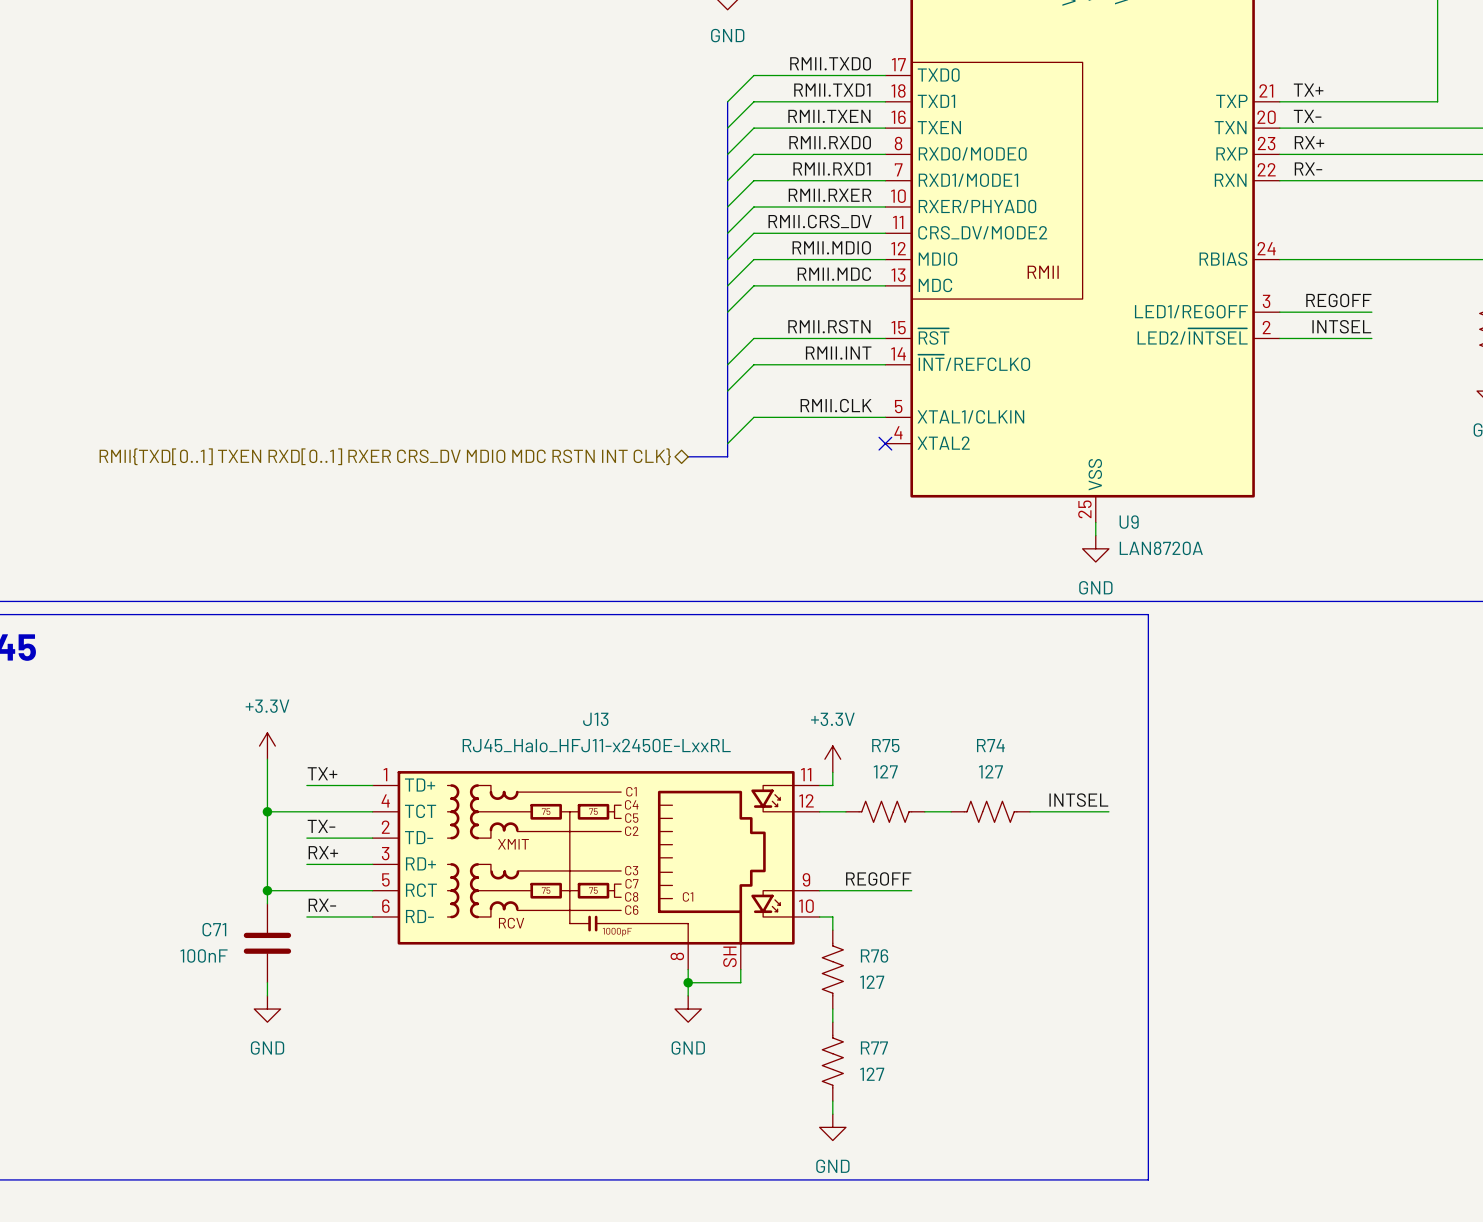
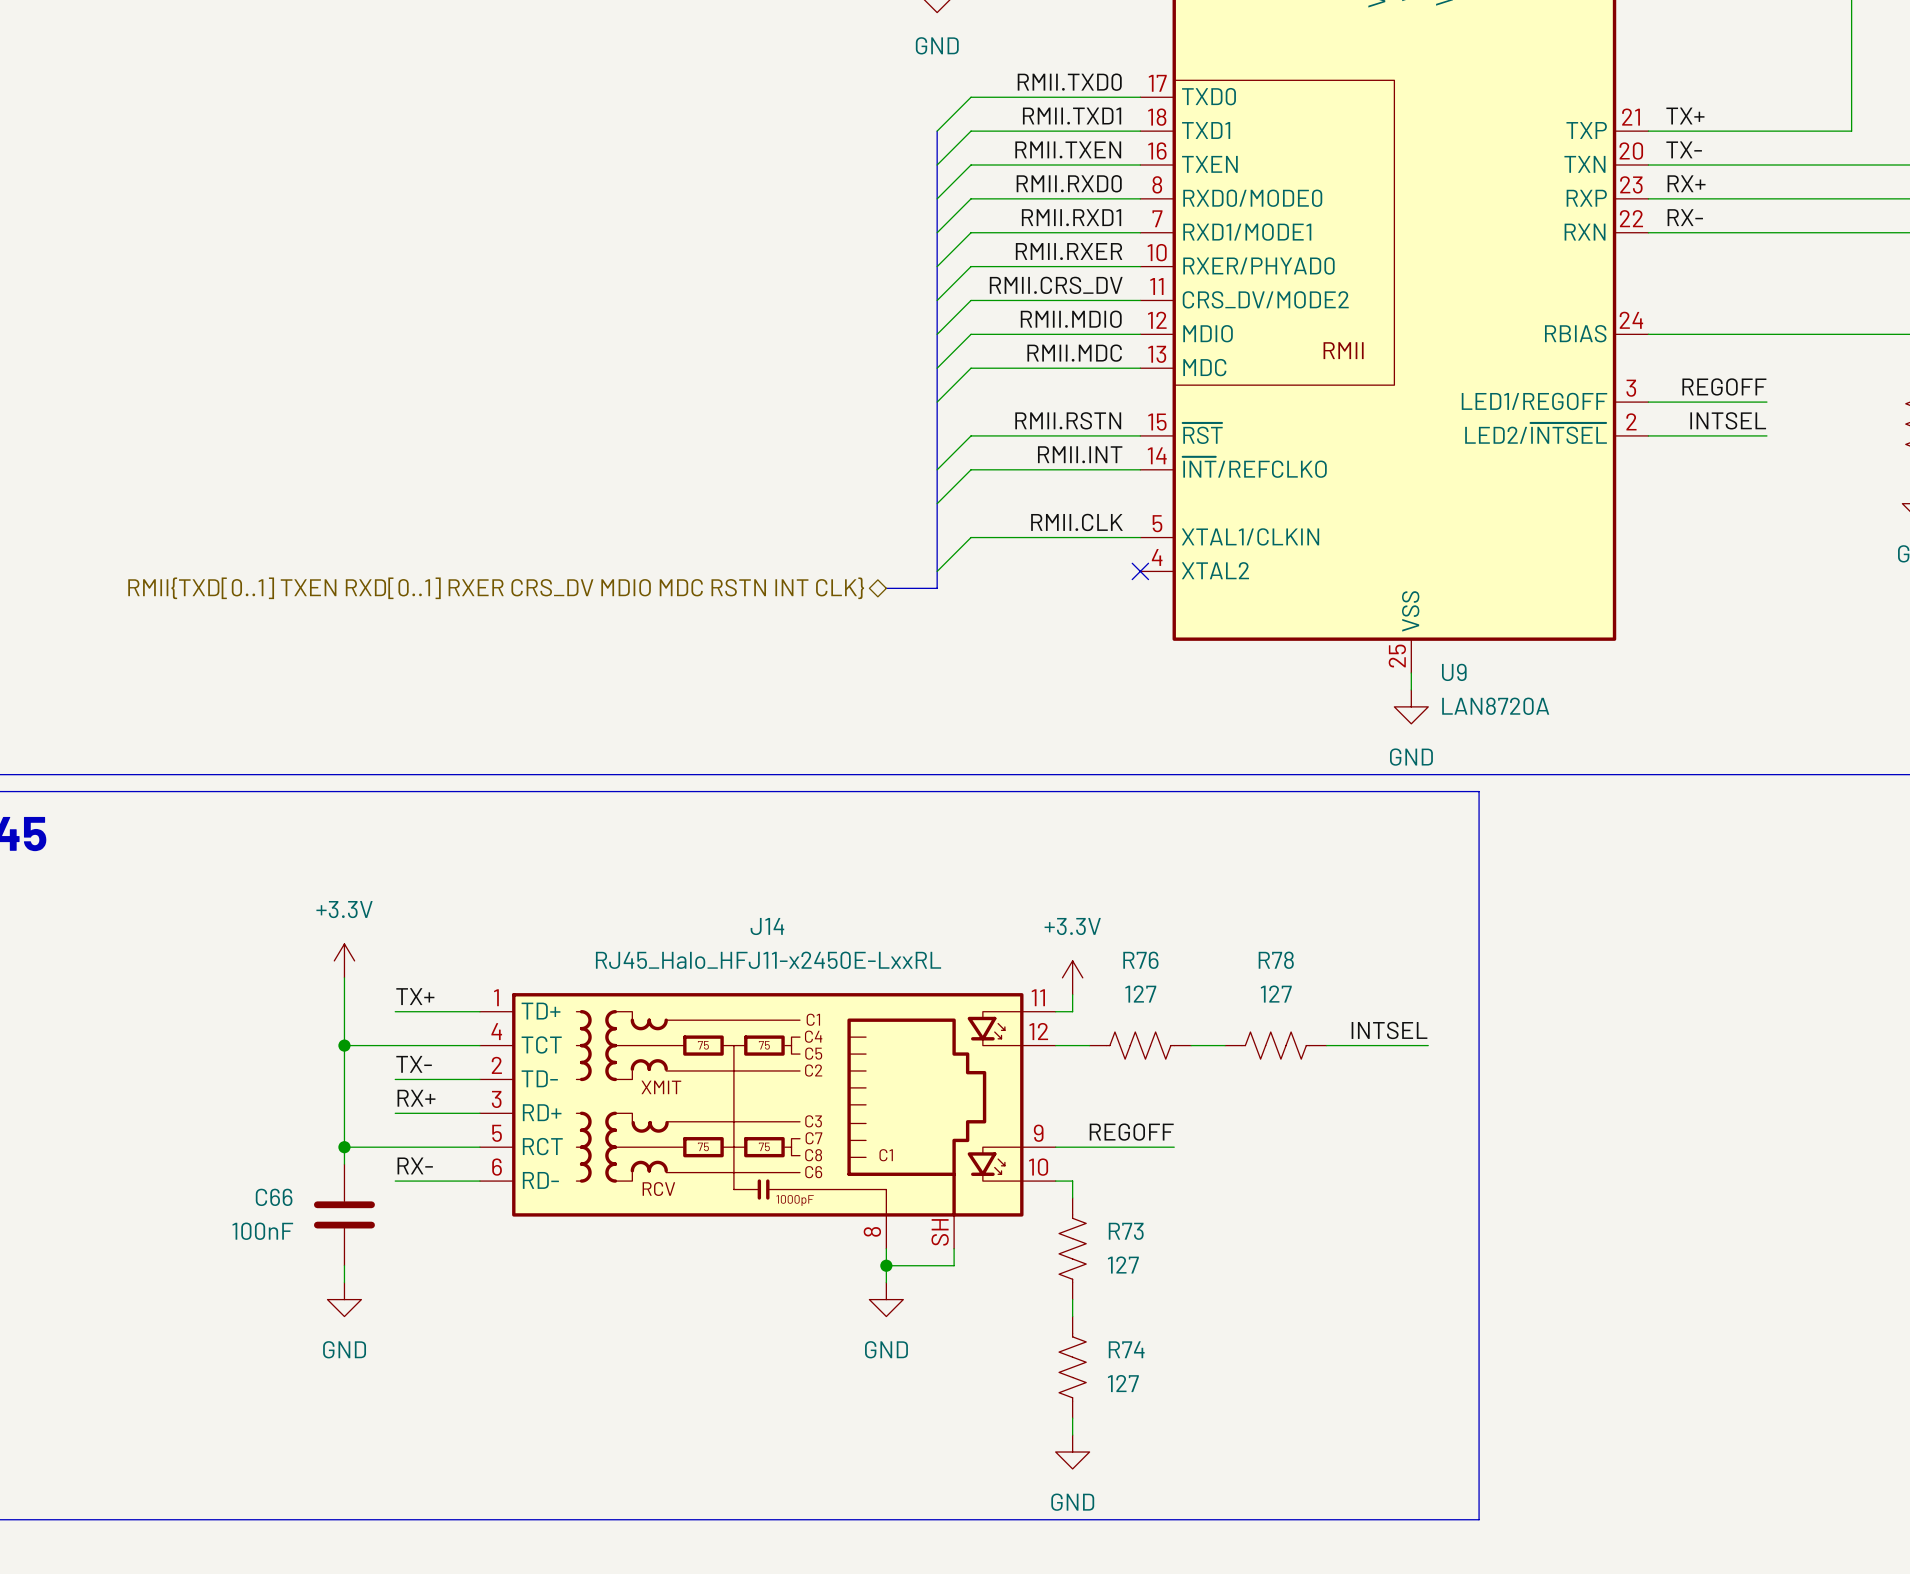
J13 name: J13 (595, 719) -> J14 (767, 926)
R75 name: R75 (885, 745) -> R76 (1140, 960)
R74 name: R74 (990, 745) -> R78 (1276, 960)
C71 name: C71 (214, 929) -> C66 (274, 1197)
R76 name: R76 (874, 955) -> R73 (1126, 1231)
R77 name: R77 (874, 1047) -> R74 (1126, 1349)

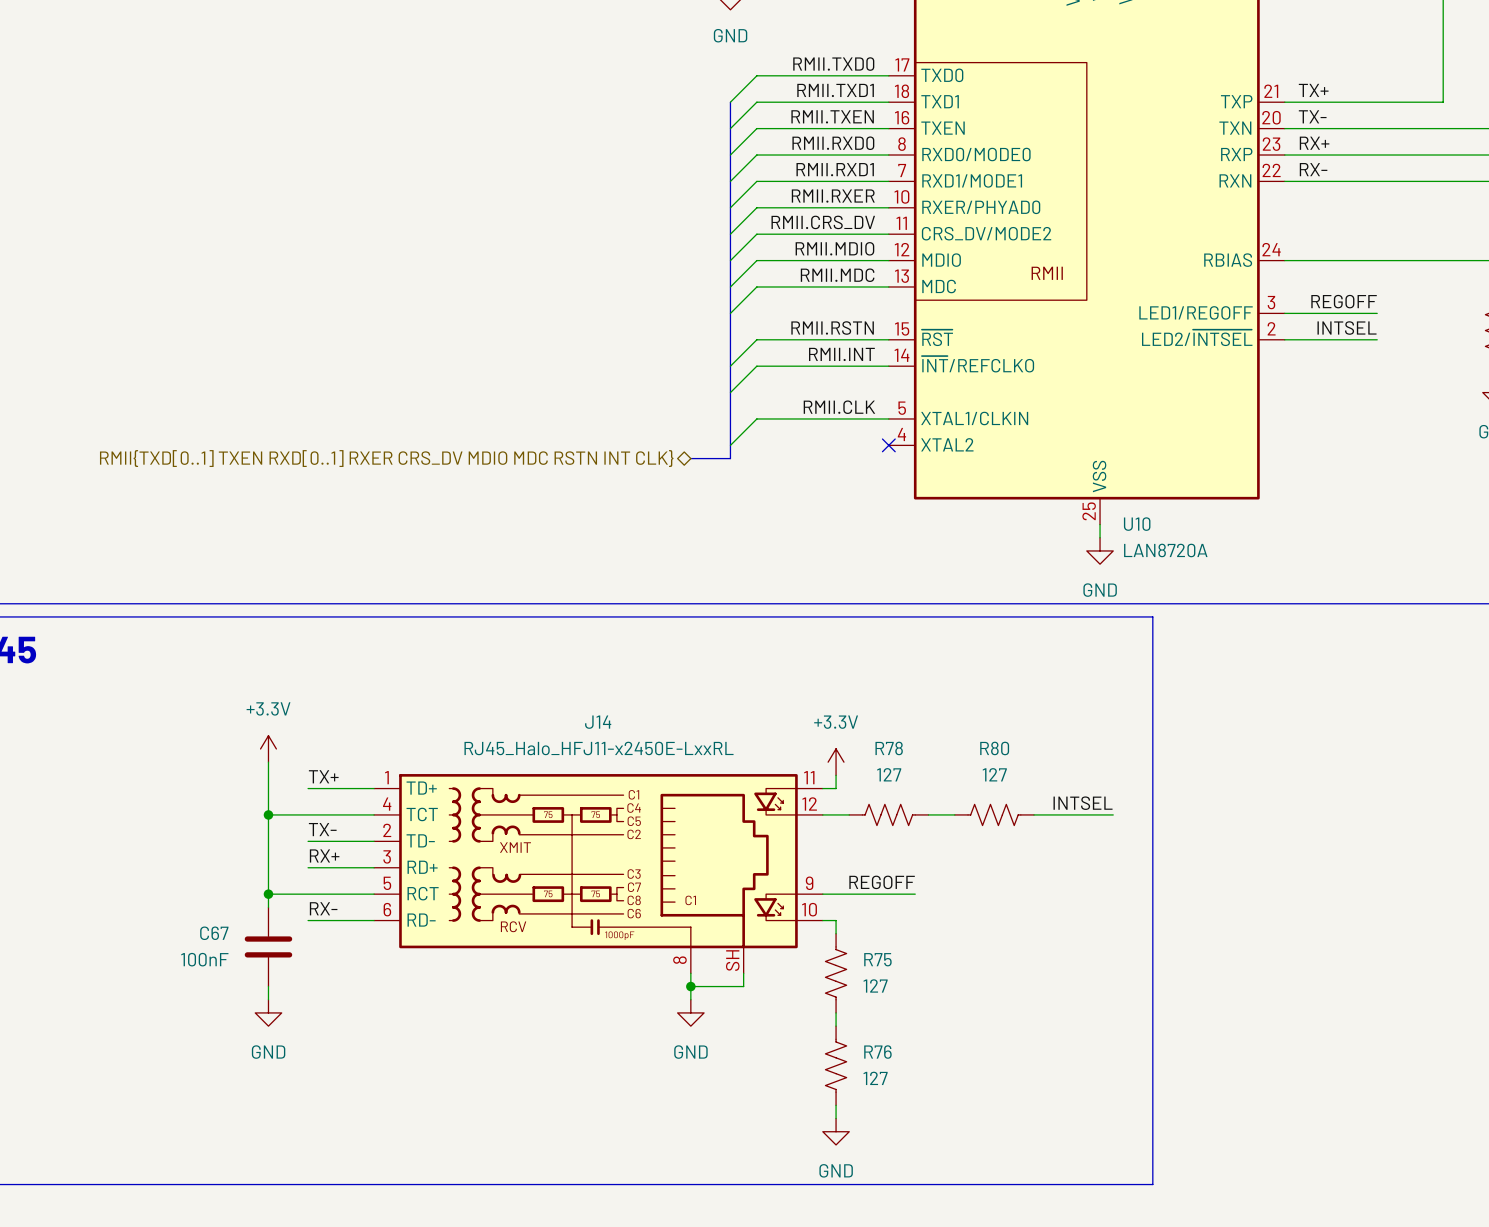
U9 name: U9 (1454, 672) -> U10 (1137, 524)
R76 name: R76 (1140, 960) -> R78 (889, 748)
R78 name: R78 (1276, 960) -> R80 (994, 748)
C66 name: C66 (274, 1197) -> C67 (214, 933)
R73 name: R73 (1126, 1231) -> R75 (877, 959)
R74 name: R74 (1126, 1349) -> R76 (877, 1052)

